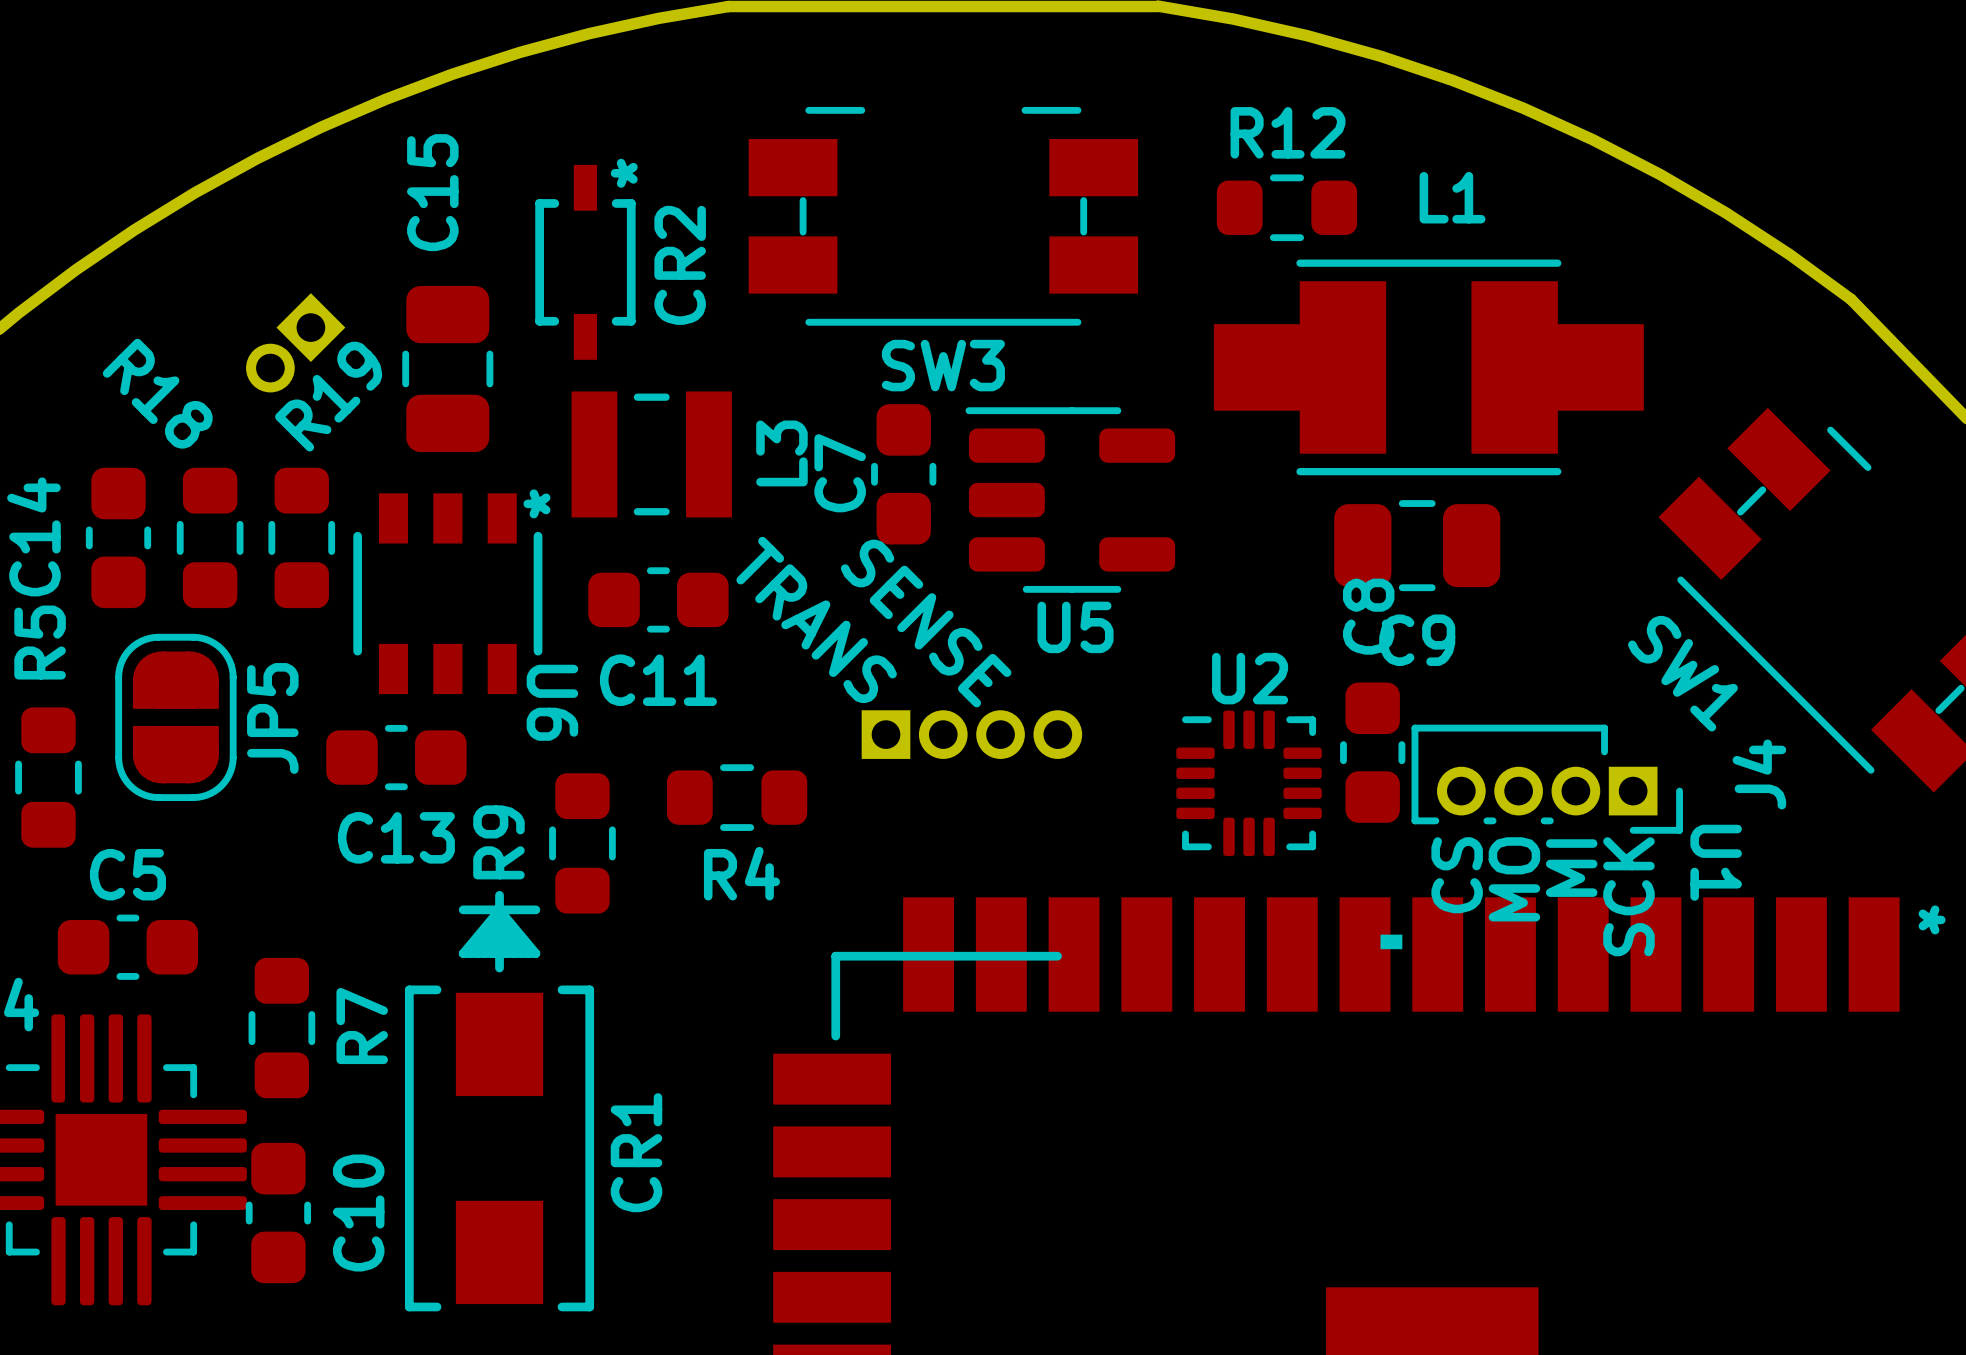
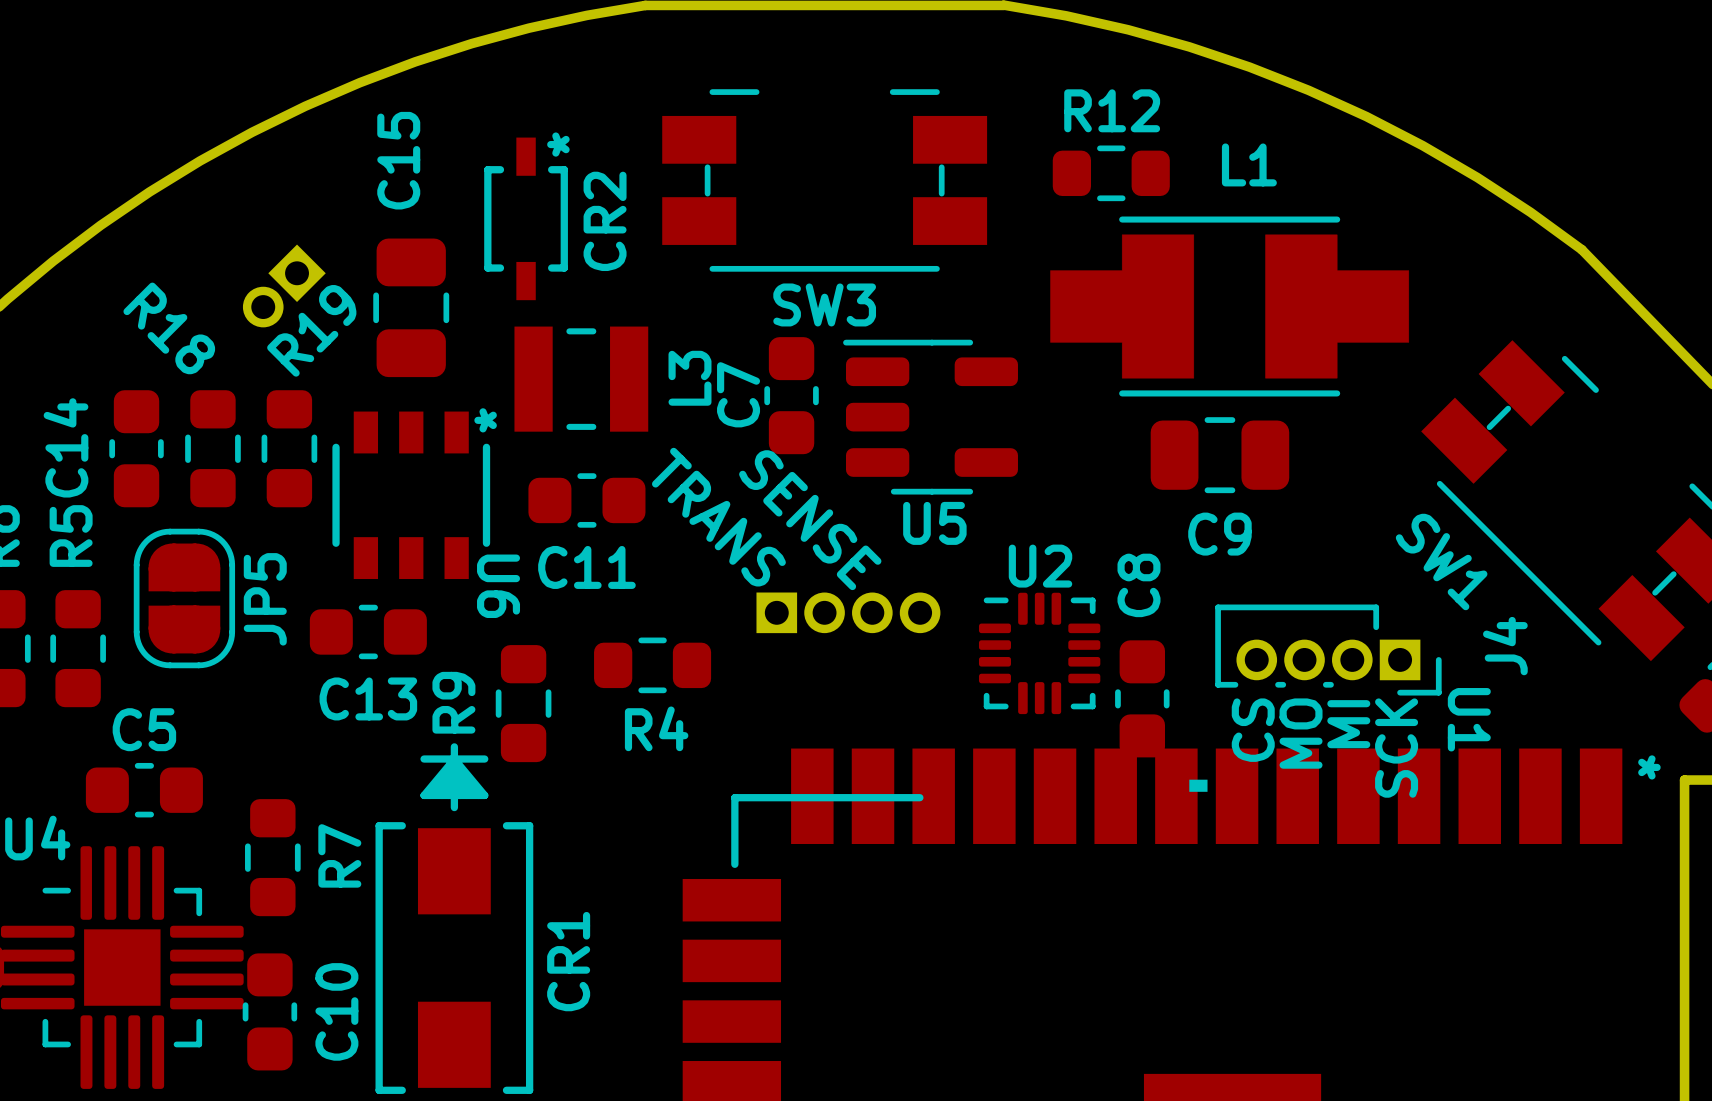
C8 position: (1372, 752) -> (1142, 698)
U2 position: (1249, 783) -> (1039, 653)

